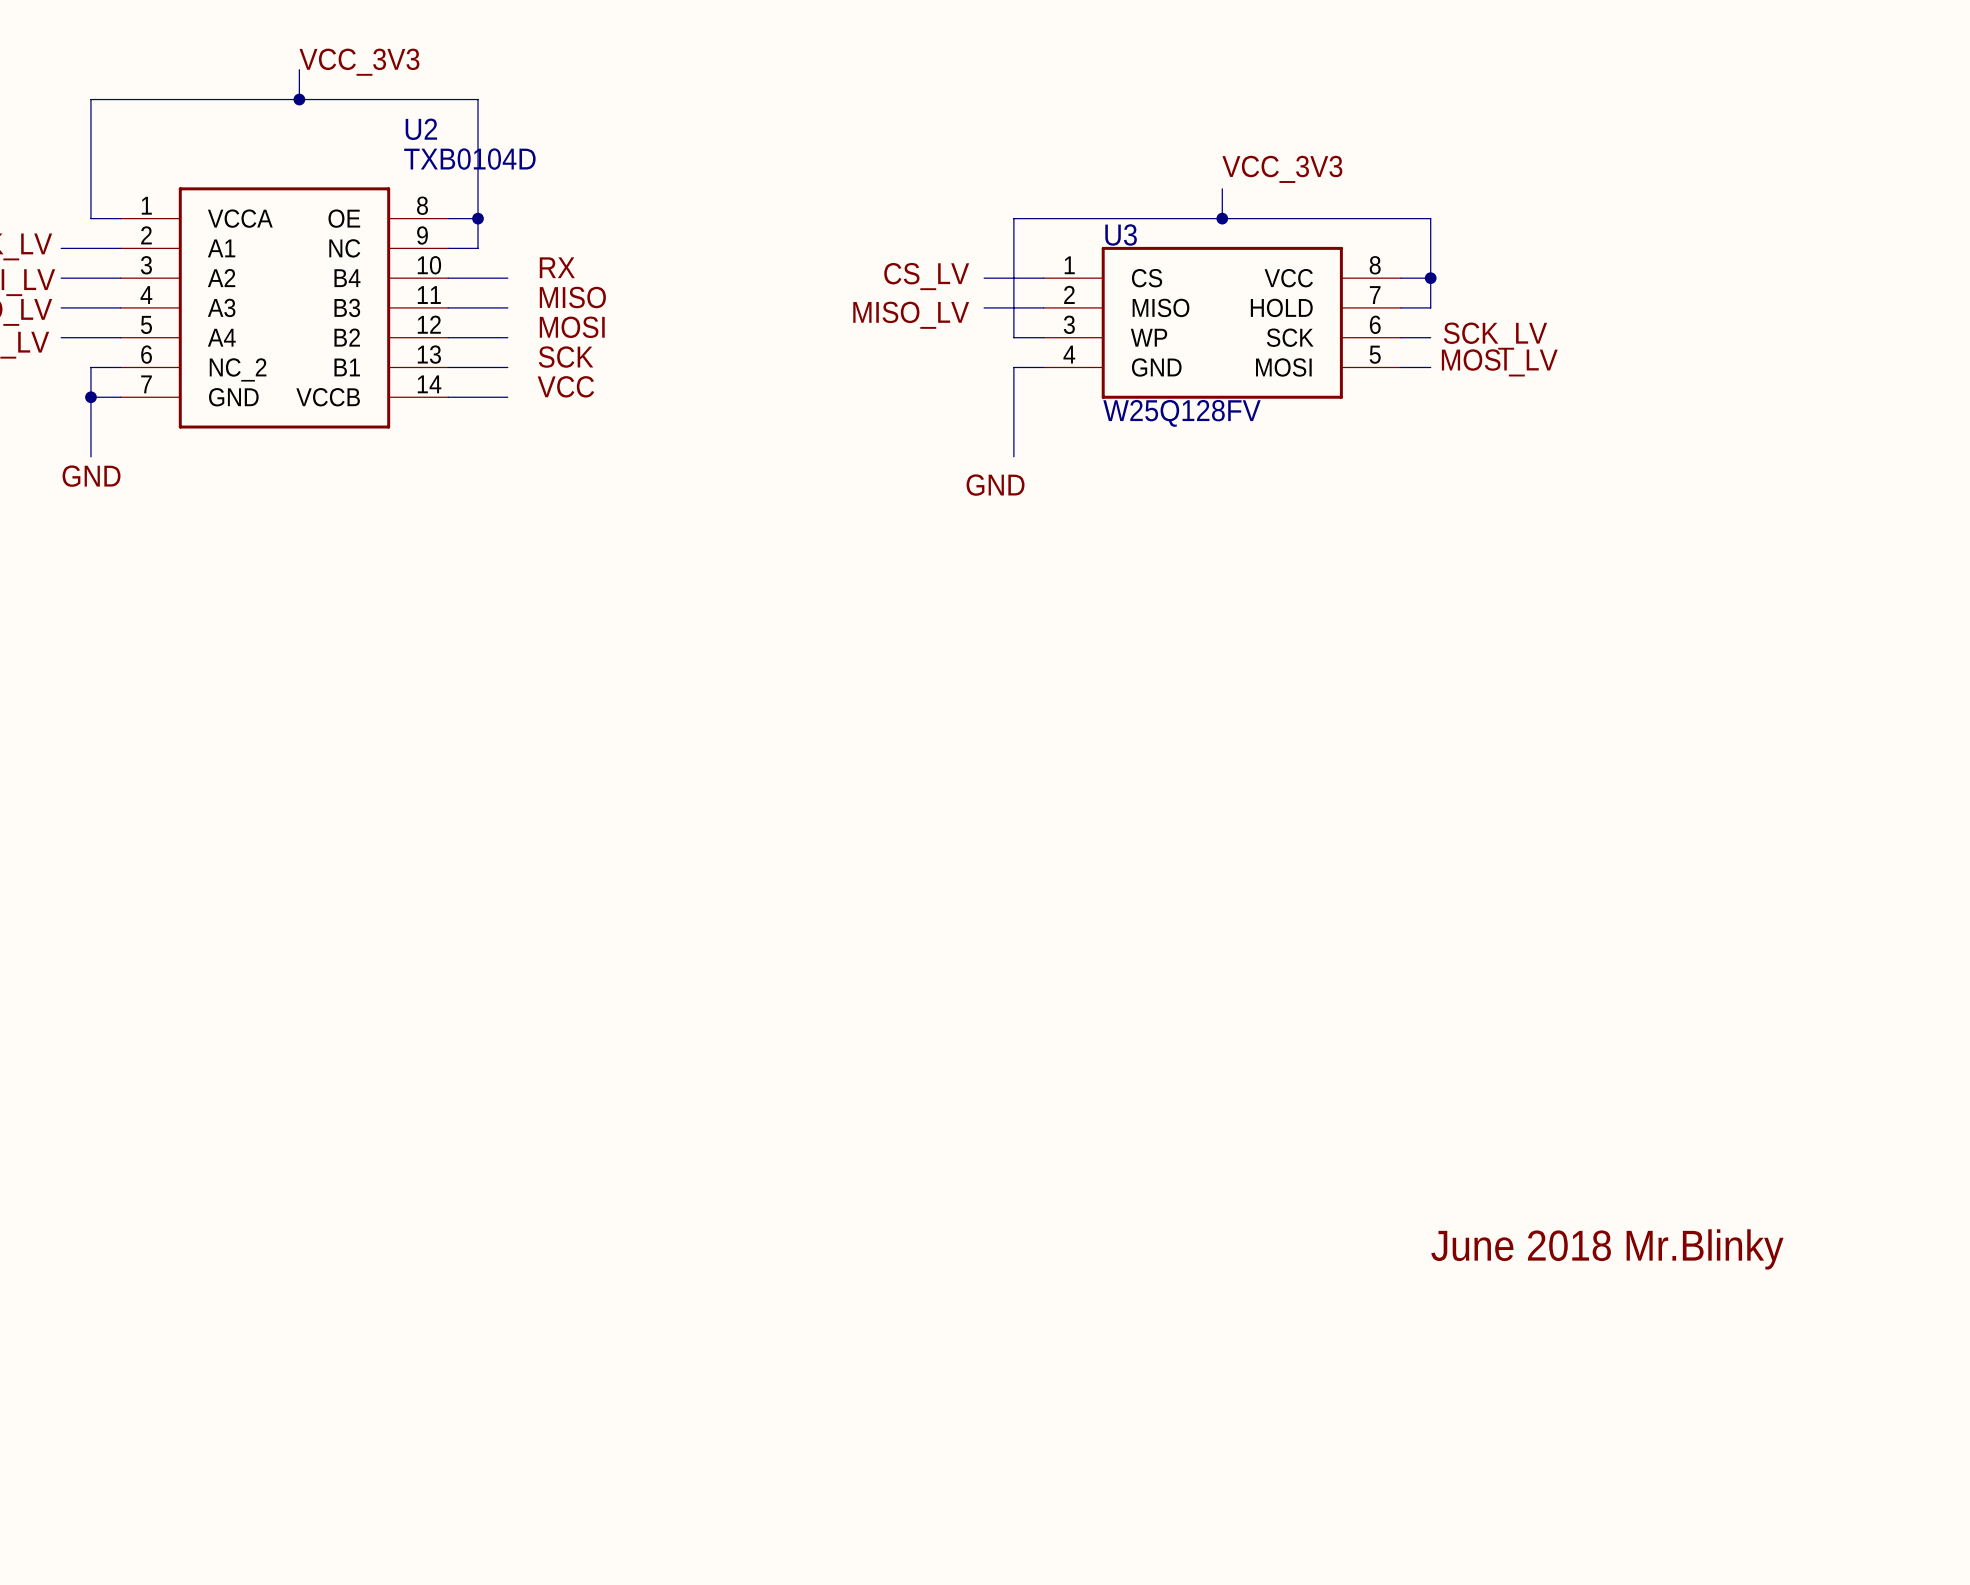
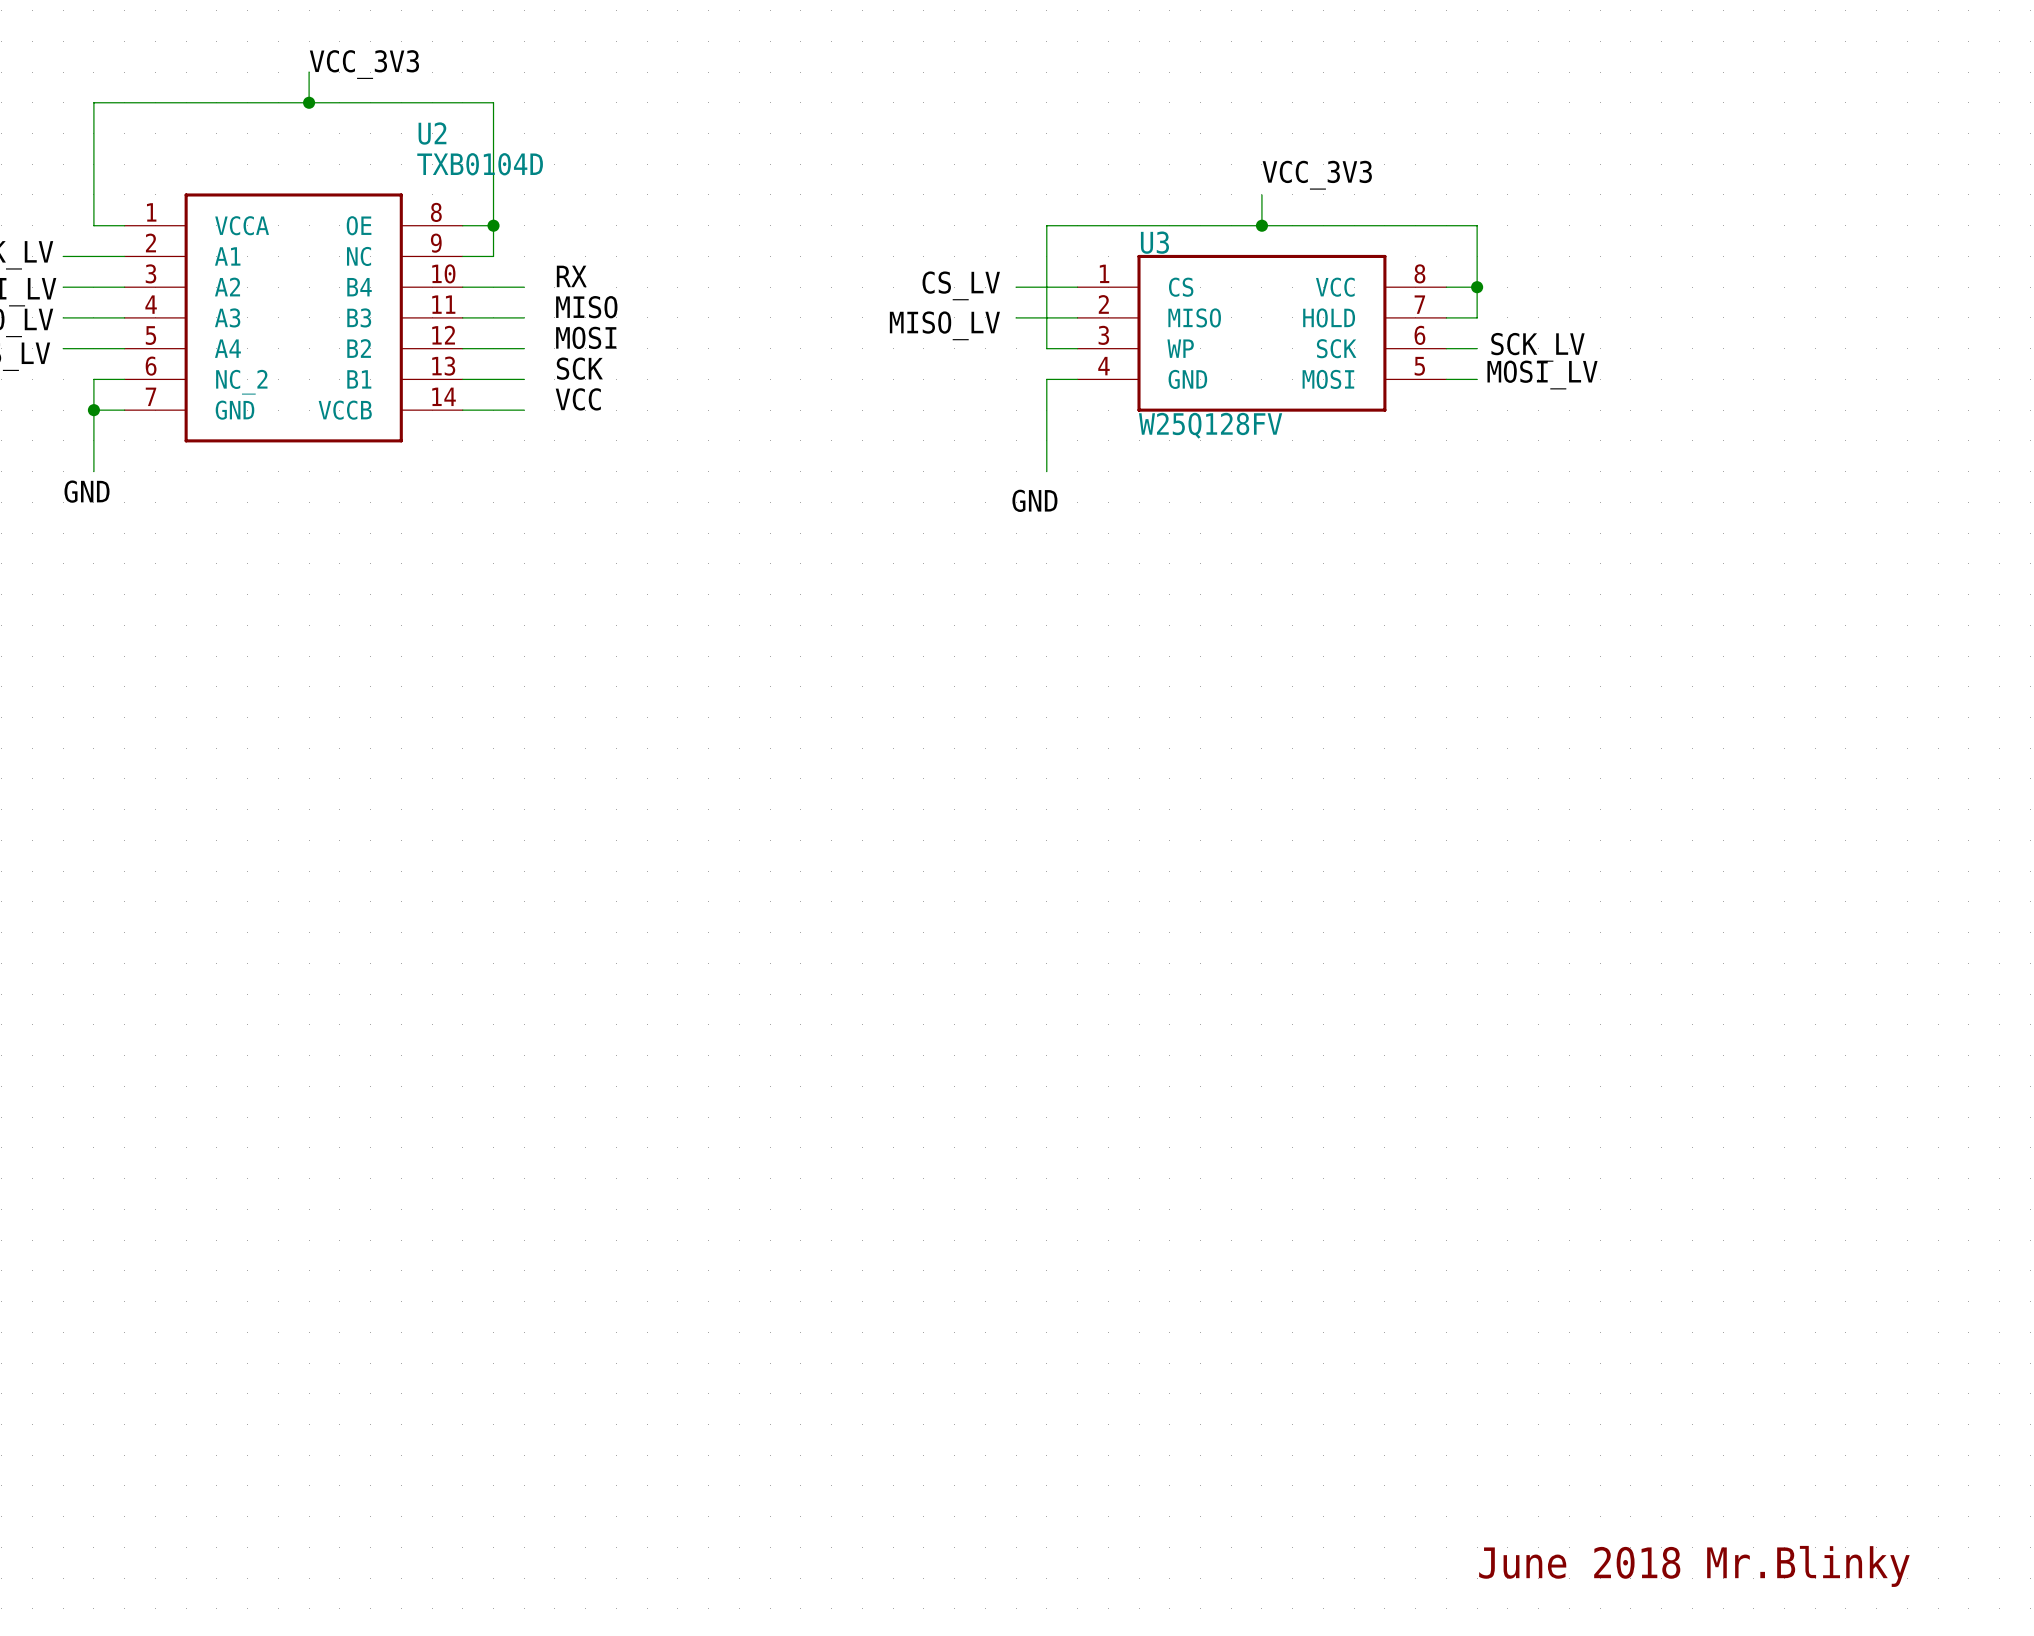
text position: June 2018 Mr.Blinky (1607, 1249) -> June 2018 Mr.Blinky (1694, 1566)

